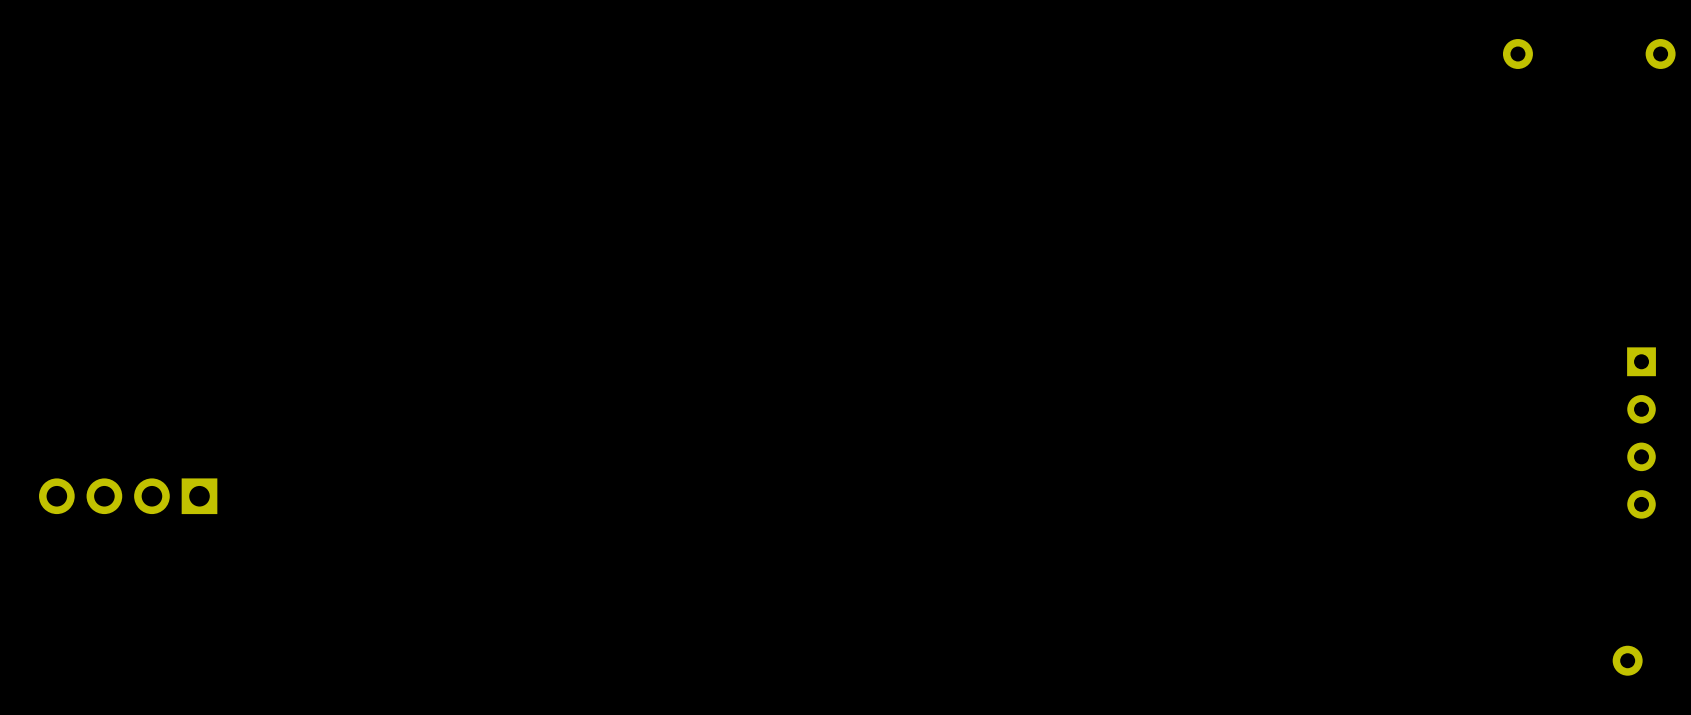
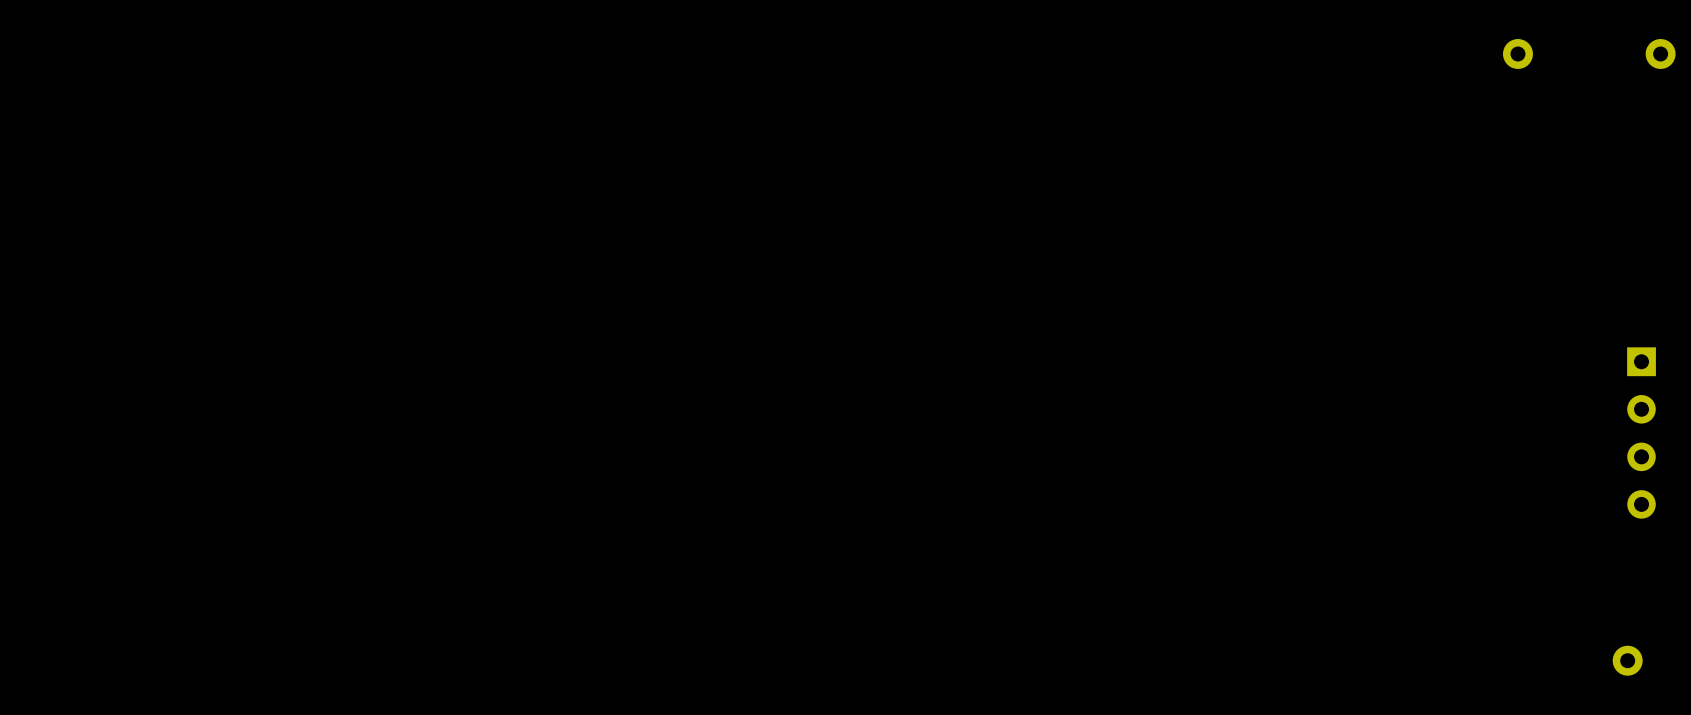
part: (128, 496) -> none

